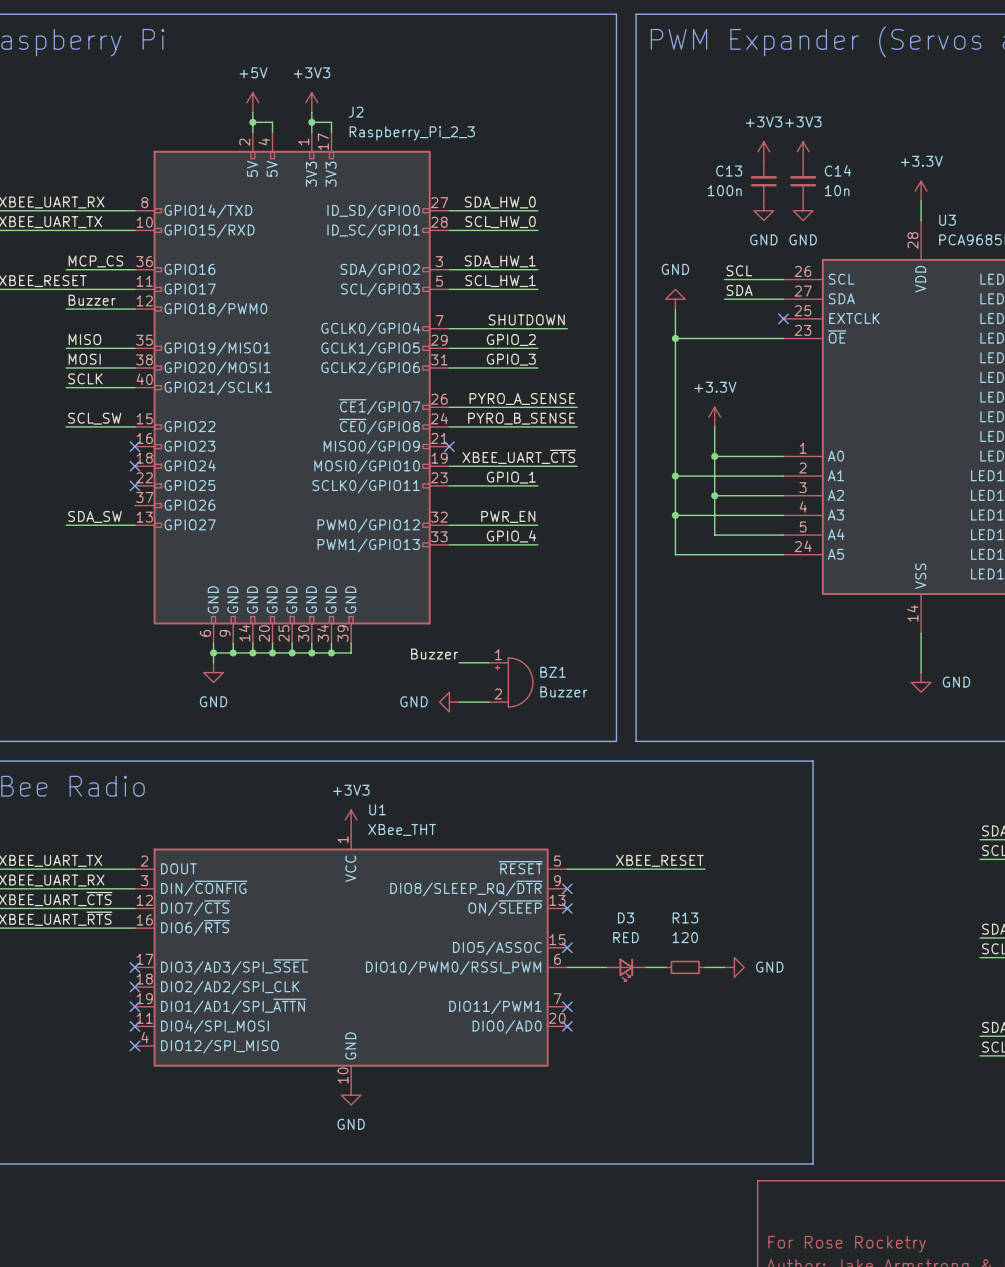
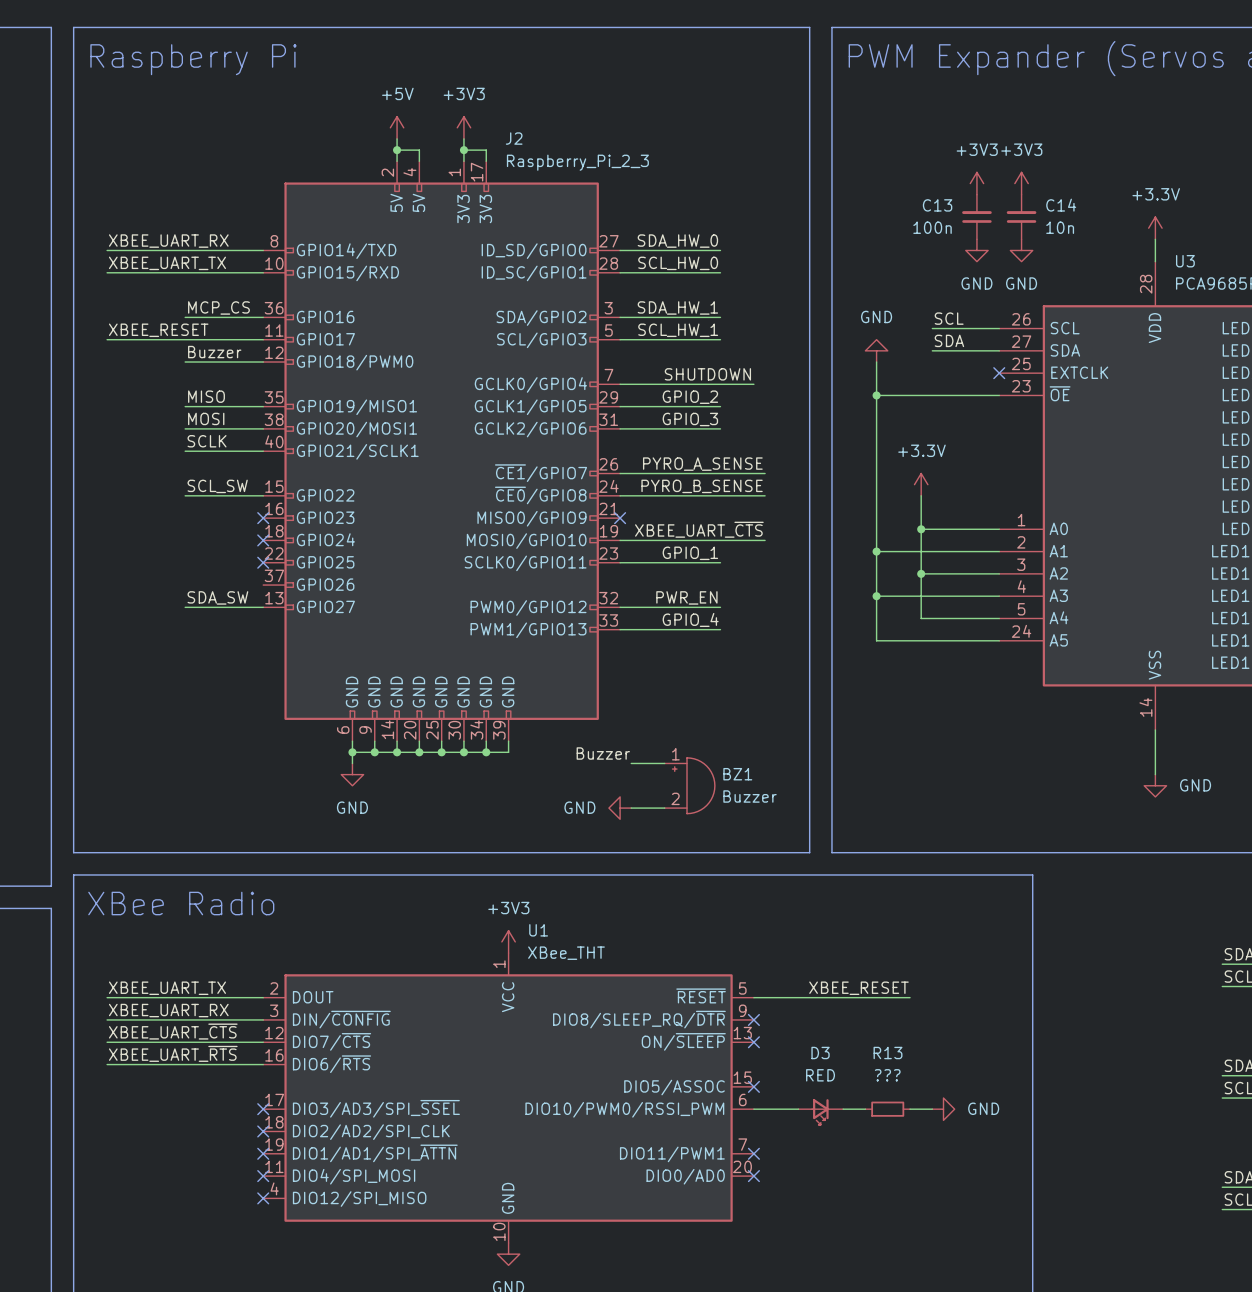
R13 value: 120 (685, 937) -> ??? (887, 1075)

